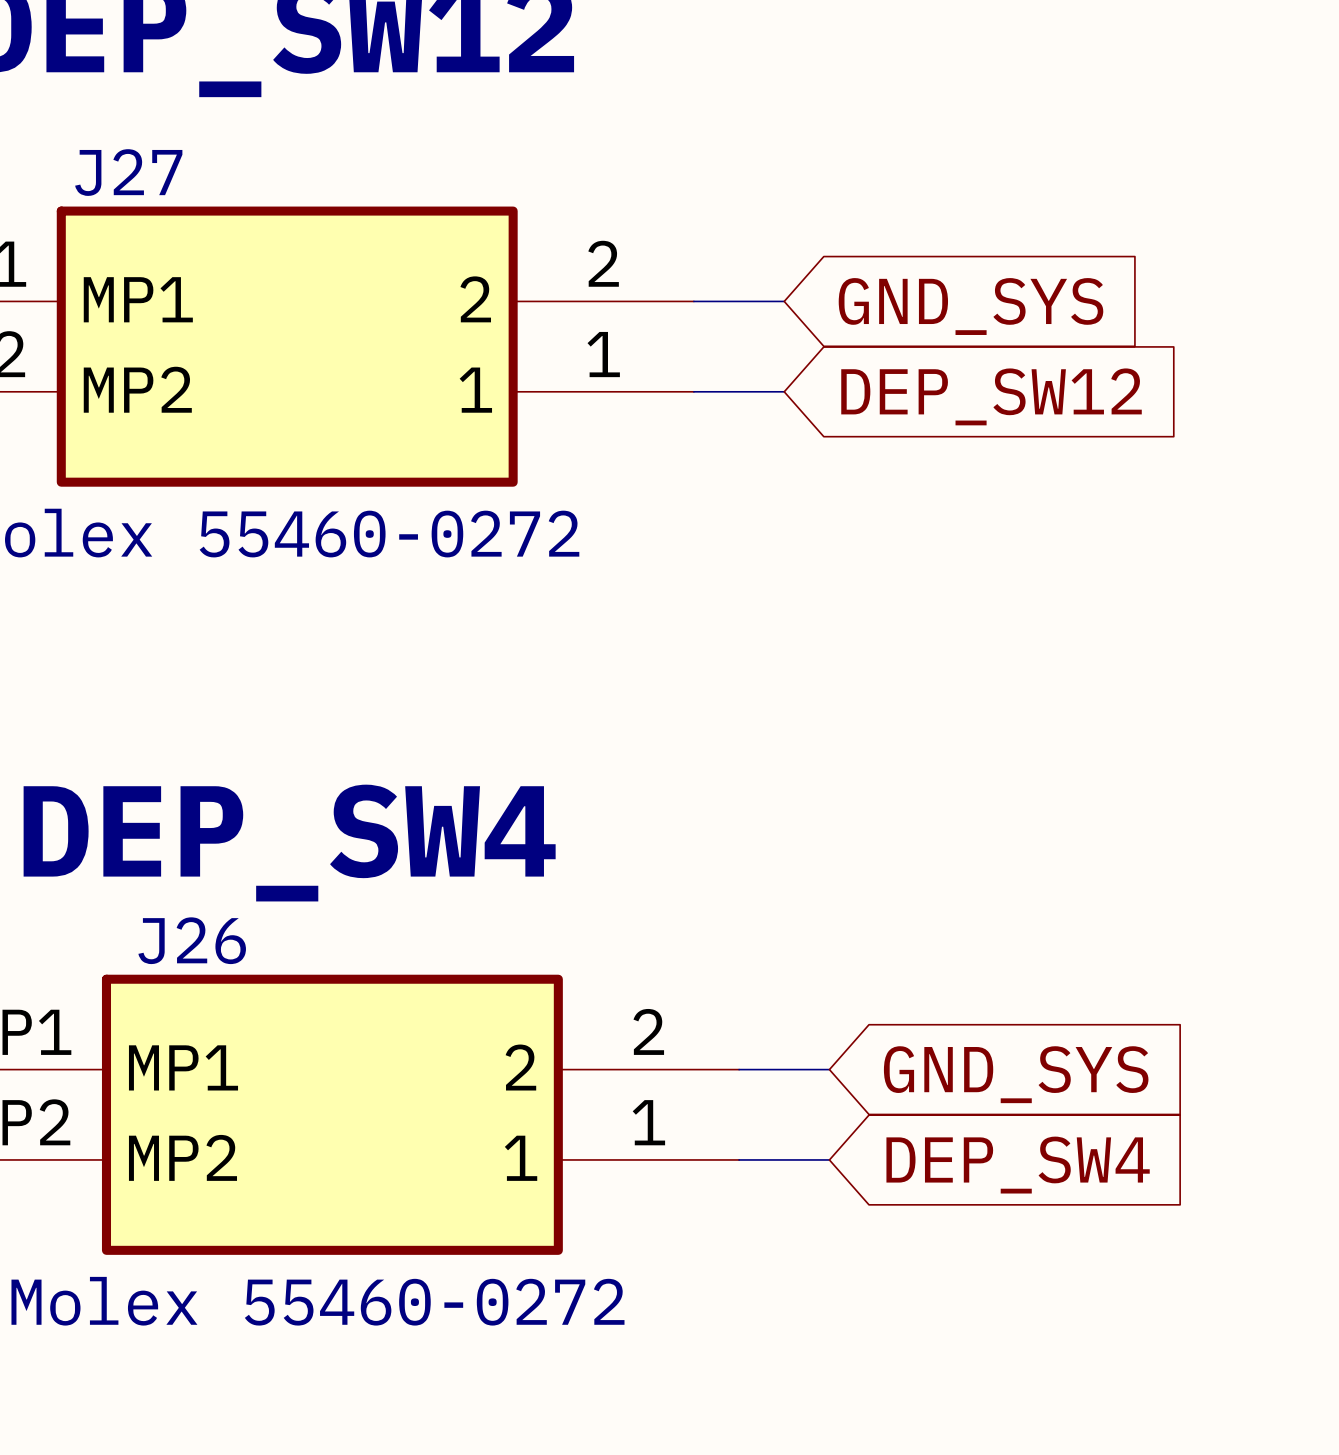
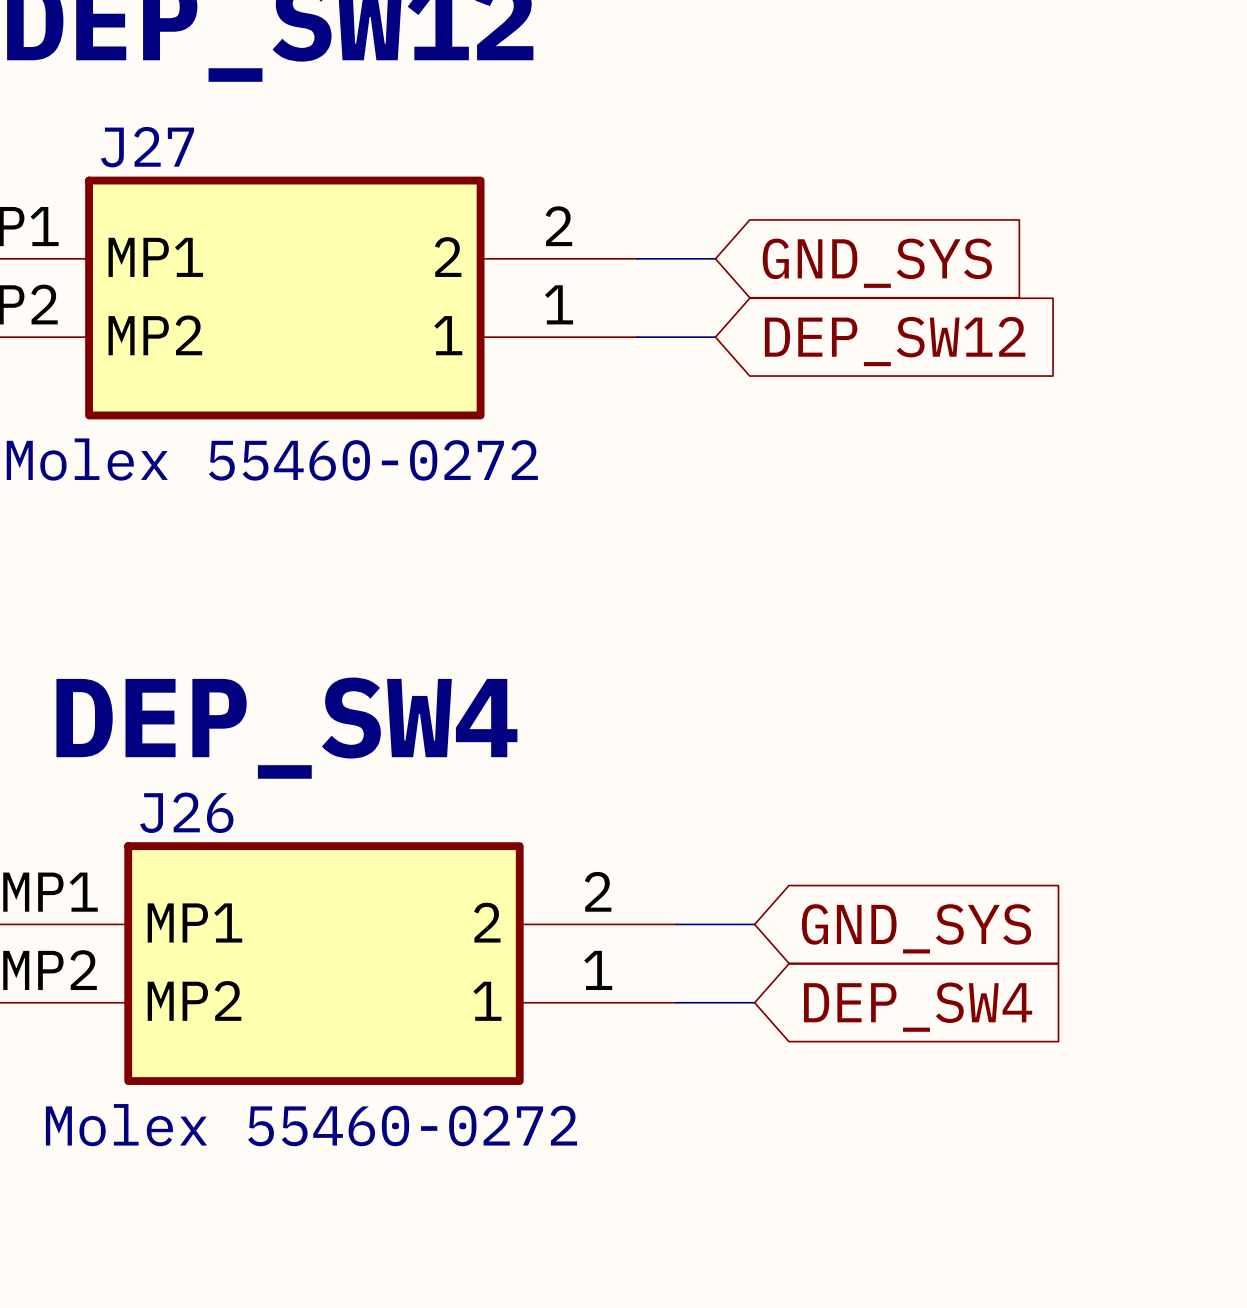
J26 name position: J26 (192, 940) -> J26 (186, 812)

